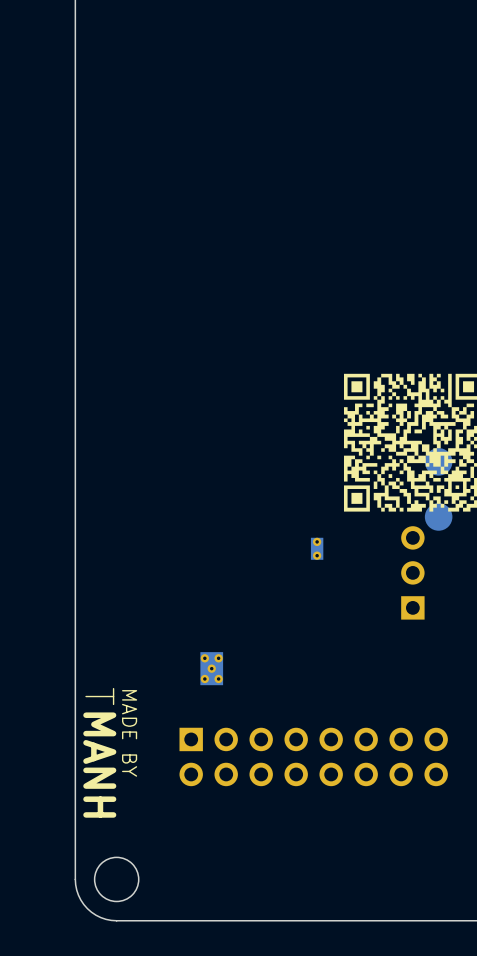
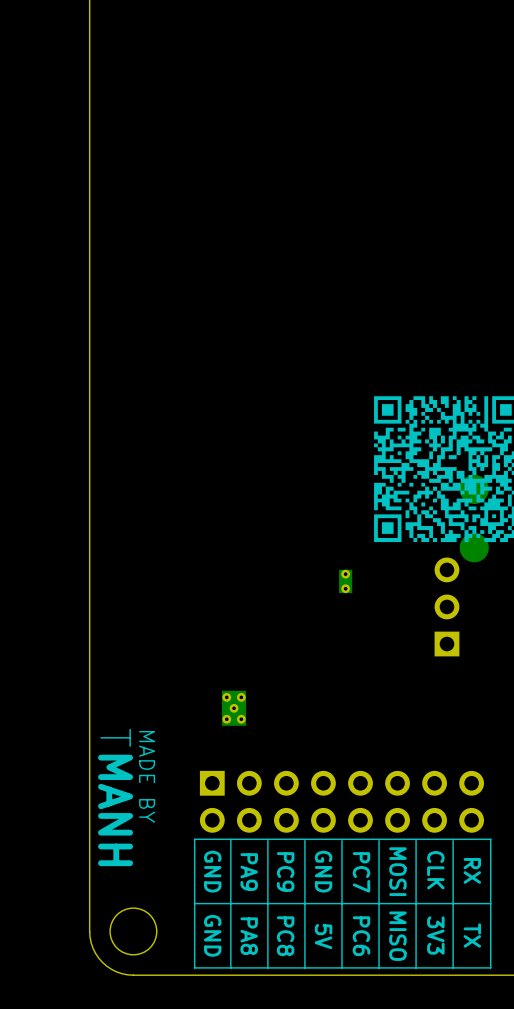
line: none -> (230, 839) (230, 967)
line: none -> (490, 839) (194, 839) (194, 967) (490, 967) (490, 839)
line: none -> (267, 840) (267, 967)
line: none -> (304, 840) (304, 967)
line: none -> (341, 840) (341, 967)
line: none -> (379, 840) (379, 968)
line: none -> (416, 840) (416, 968)
line: none -> (453, 840) (453, 967)
text: none -> CLK (435, 870)
text: none -> GND (212, 871)
text: none -> GND (323, 871)
text: none -> MOSI (397, 871)
text: none -> RX (472, 870)
text: none -> PA9 (249, 872)
text: none -> PC9 (285, 872)
text: none -> PC7 (361, 872)
line: none -> (490, 903) (194, 903)
text: none -> GND (212, 935)
text: none -> PA8 (249, 936)
text: none -> PC8 (285, 936)
text: none -> PC6 (361, 936)
text: none -> MISO (397, 936)
text: none -> 3V3 (435, 935)
text: none -> TX (472, 935)
text: none -> 5V (323, 936)

